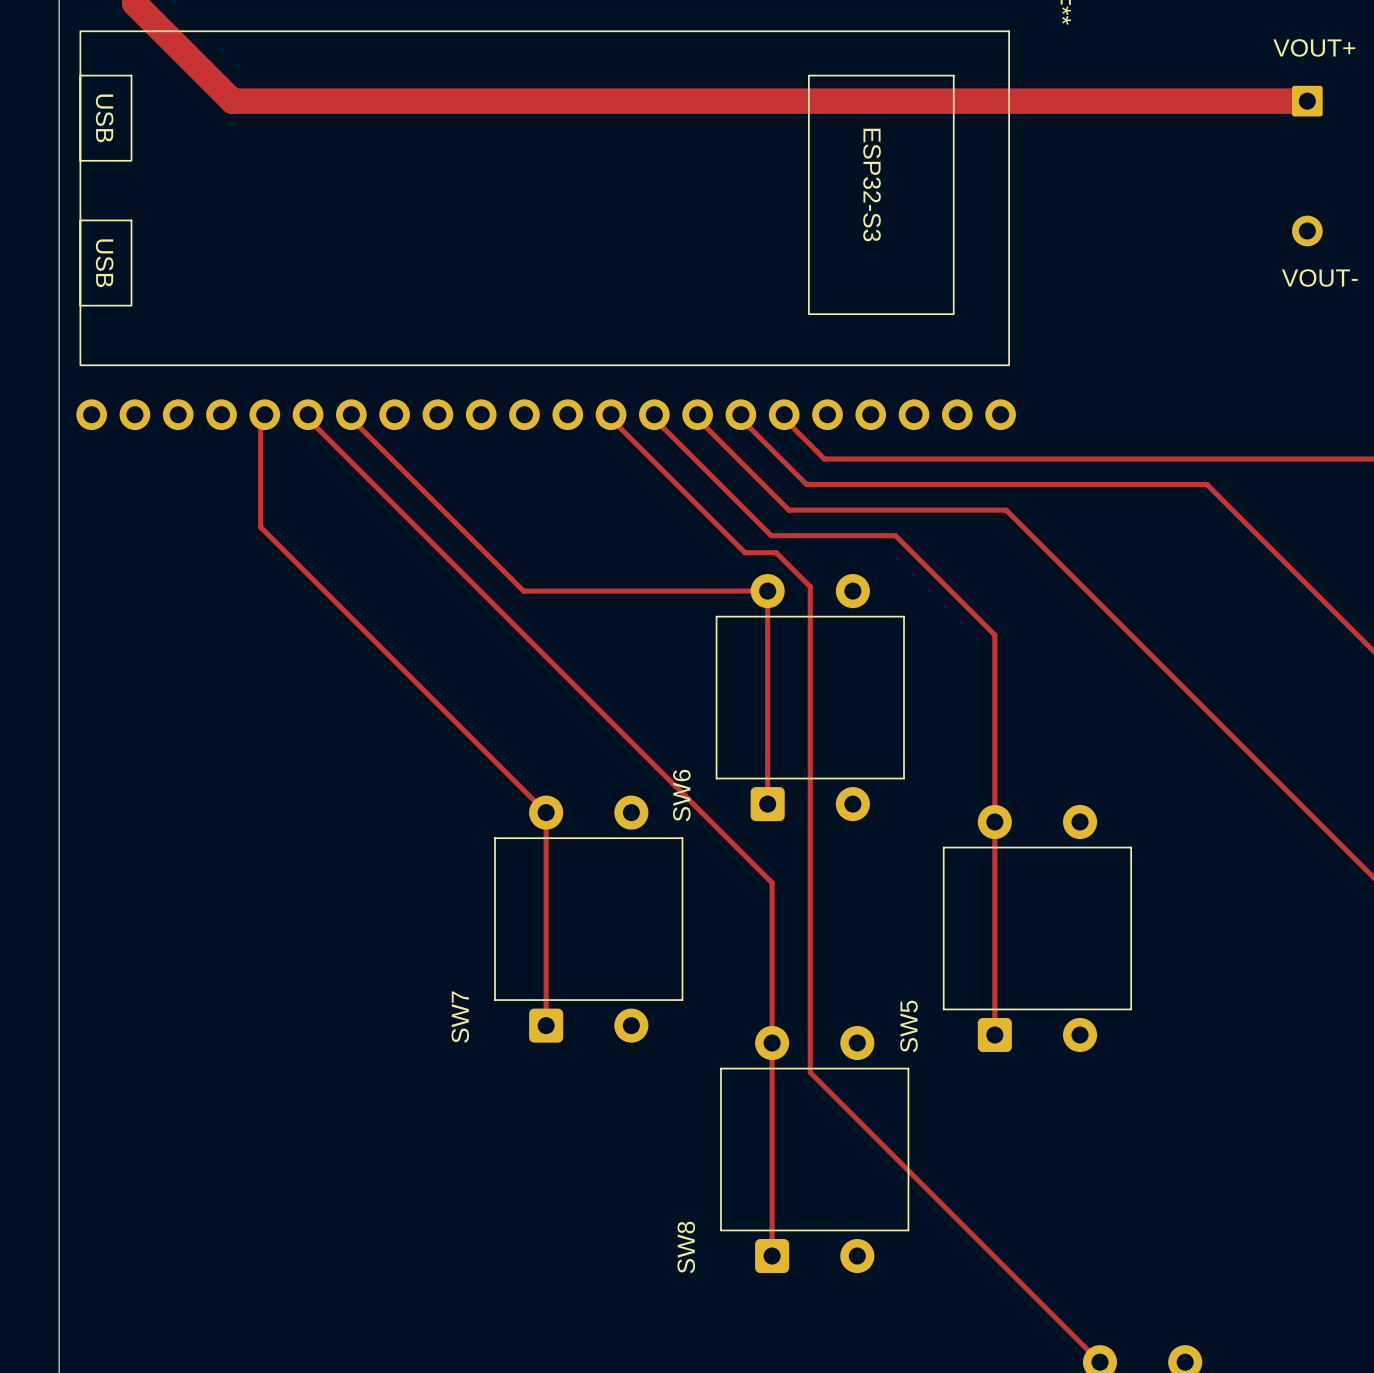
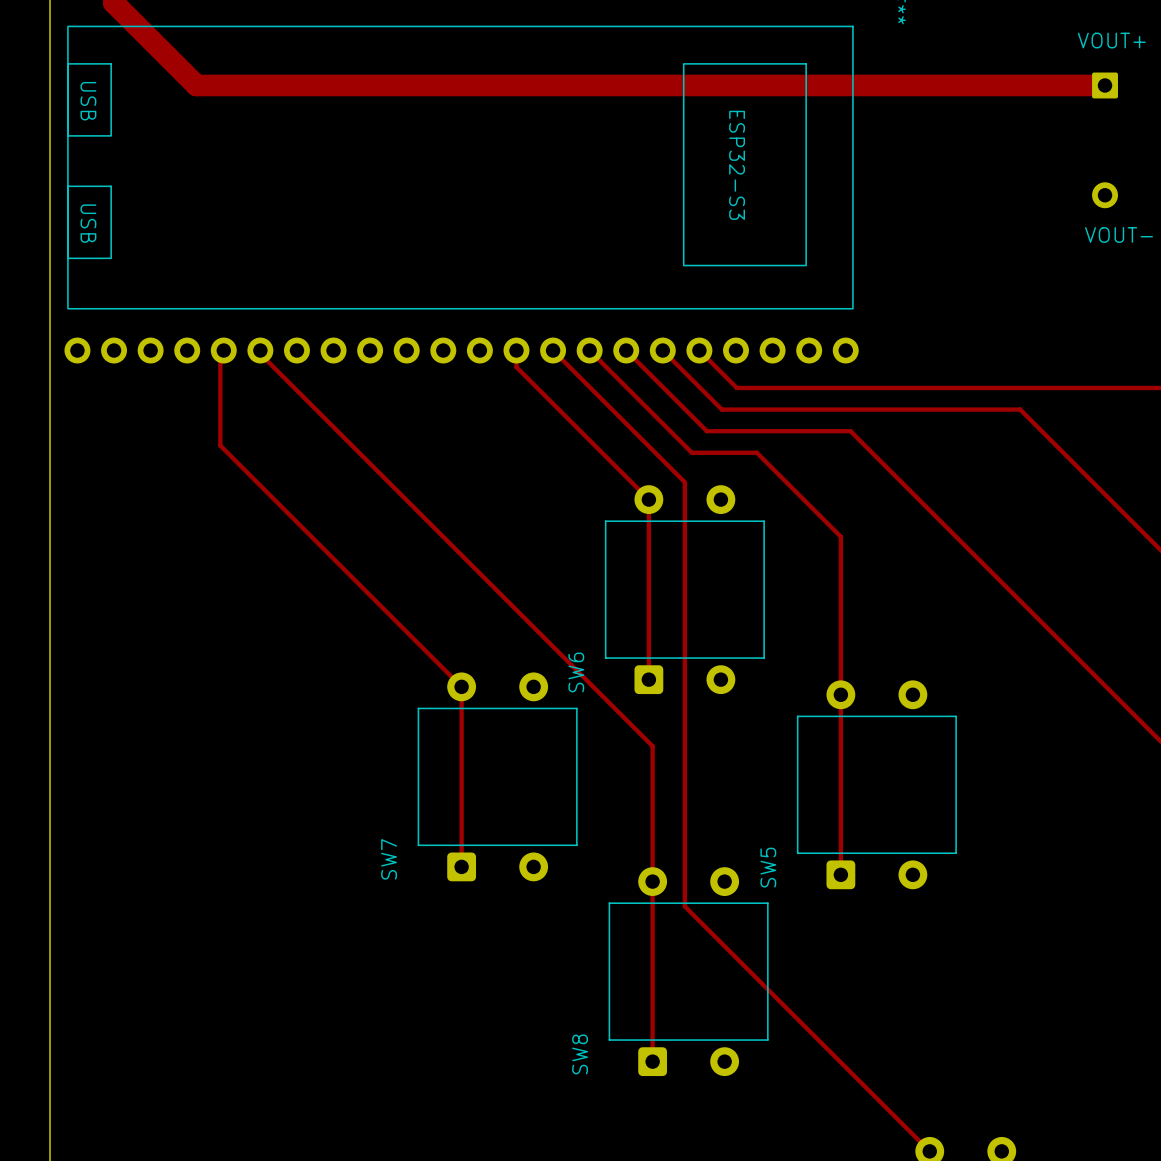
track: (347, 414) (523, 591) (767, 591) -> (516, 350) (516, 367) (648, 499)
track: (606, 414) (744, 552) (776, 552) (810, 586) -> (553, 350) (684, 482) (684, 496)
track: (650, 414) (771, 535) (818, 535) -> (589, 350) (691, 452)
track: (693, 414) (788, 510) (836, 510) -> (626, 350) (706, 431)
track: (736, 414) (806, 484) (854, 484) -> (662, 350) (721, 409)
track: (780, 414) (824, 459) (871, 459) -> (699, 350) (736, 387)

